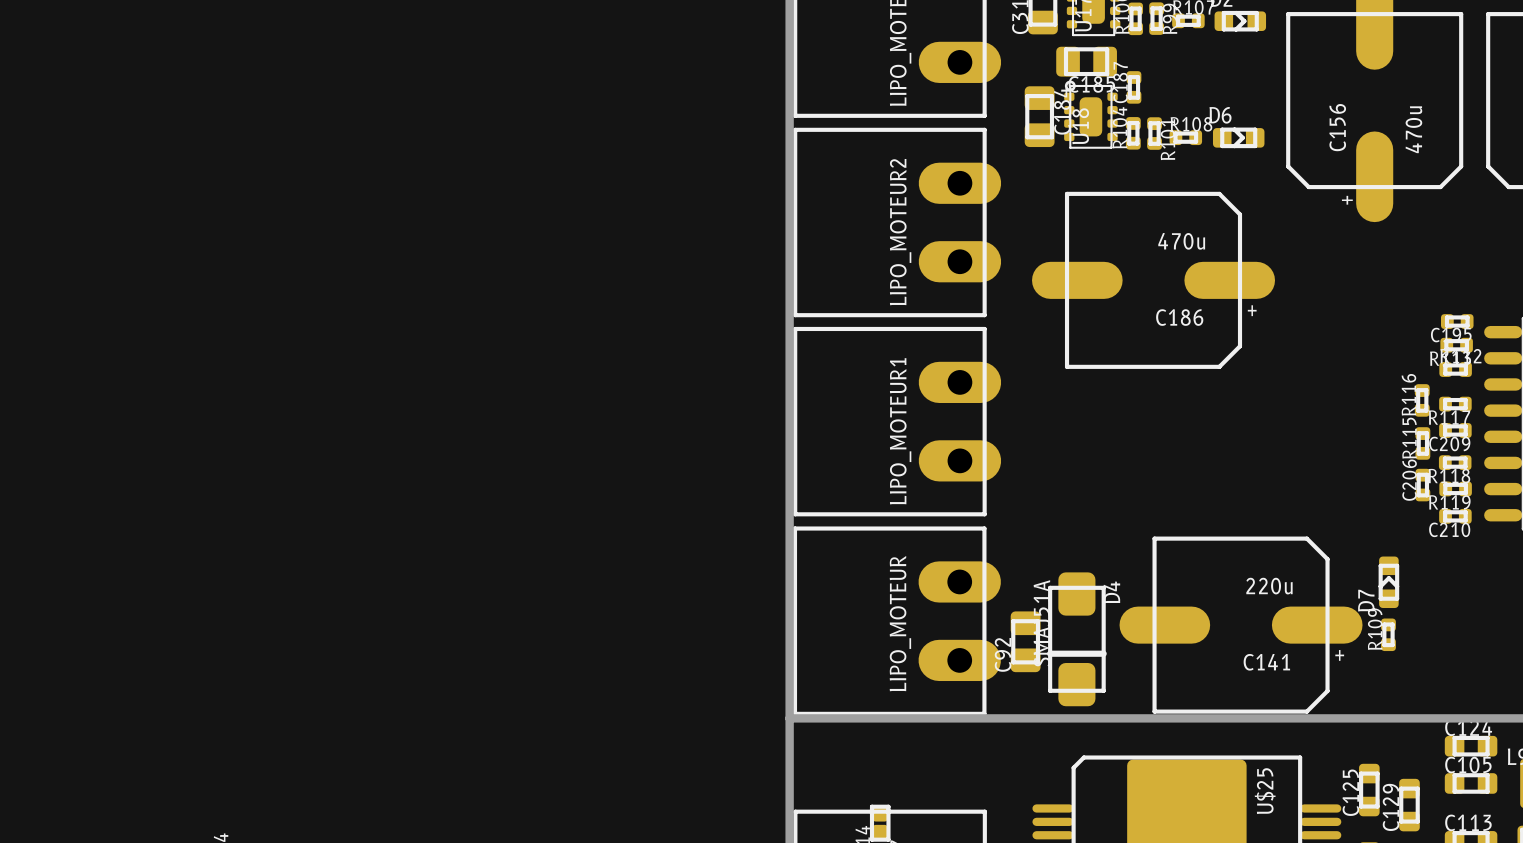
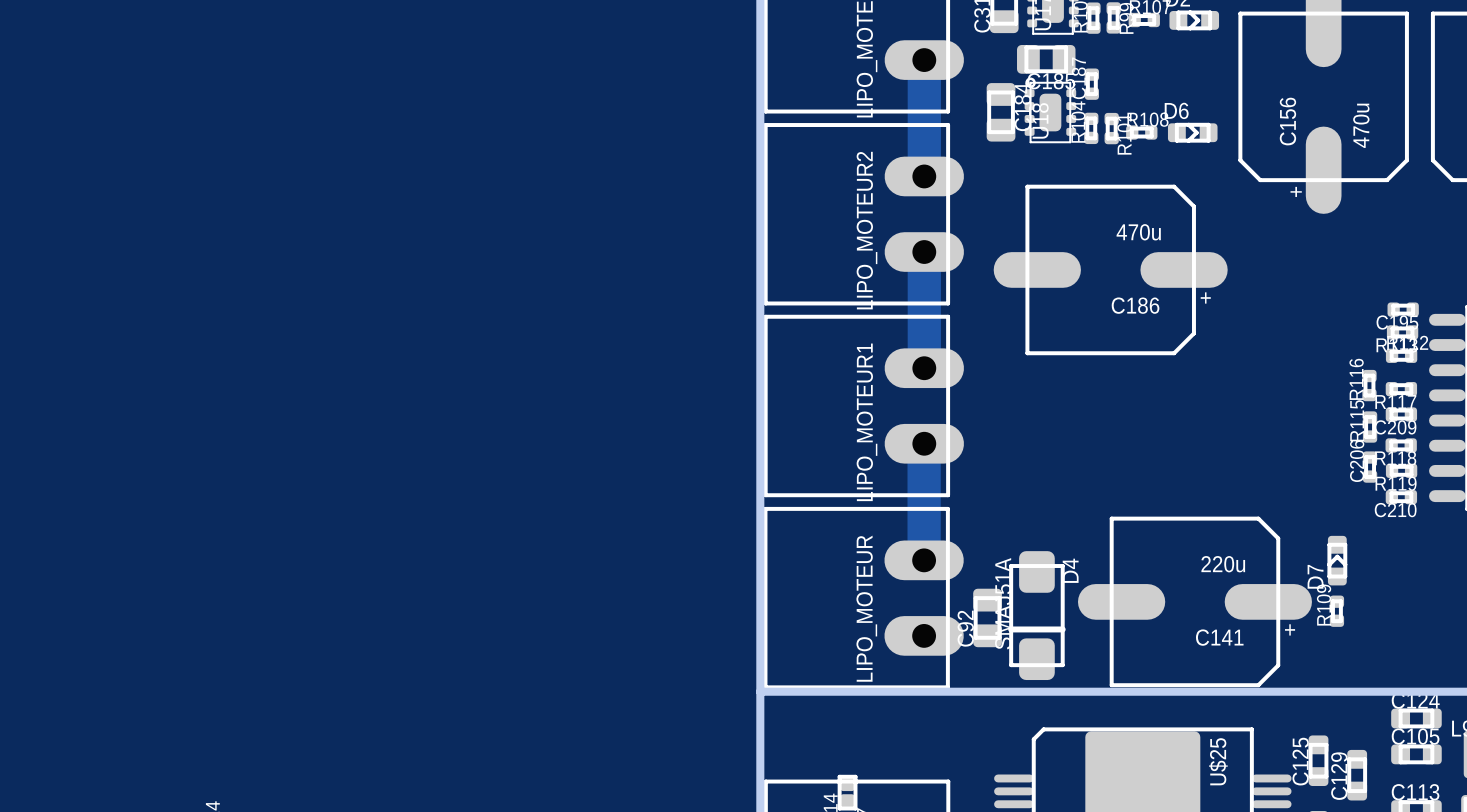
track: none -> (924, 60) (924, 176)
track: none -> (924, 252) (924, 368)
track: none -> (924, 443) (924, 560)

